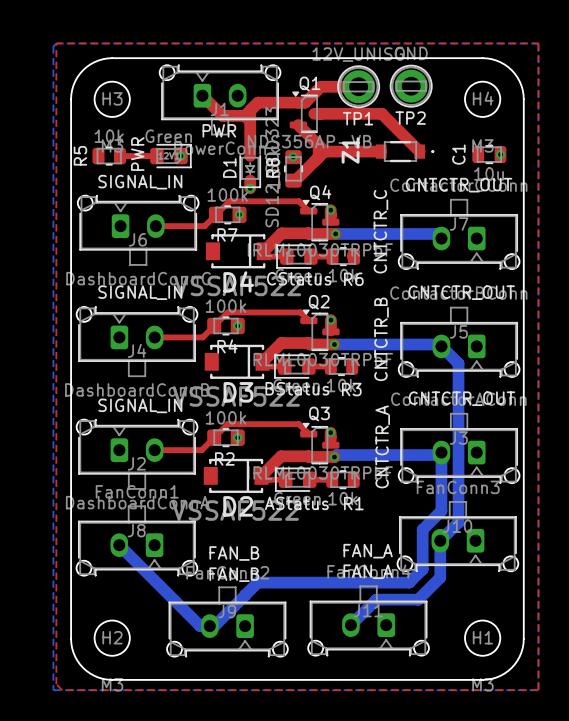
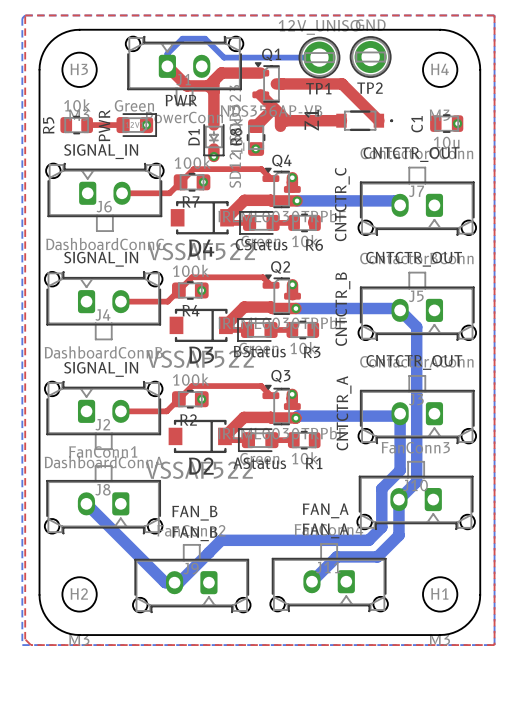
top track: (358, 86) (321, 86) (305, 102) (298, 102) -> none
bottom track: none -> (319, 57) (224, 57) (205, 38) (182, 38) (167, 53) (167, 66)
top track: none -> (270, 111) (256, 126)
top track: (324, 151) (295, 180) -> none
via position: (293, 156) -> (255, 148)

